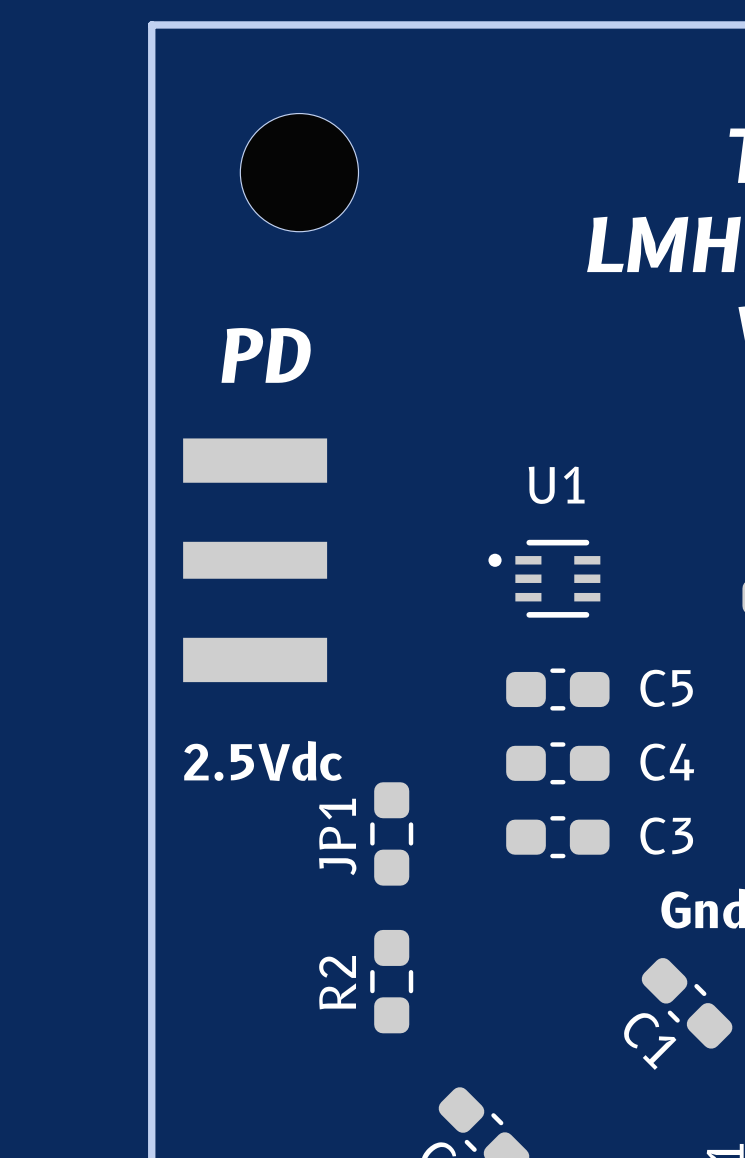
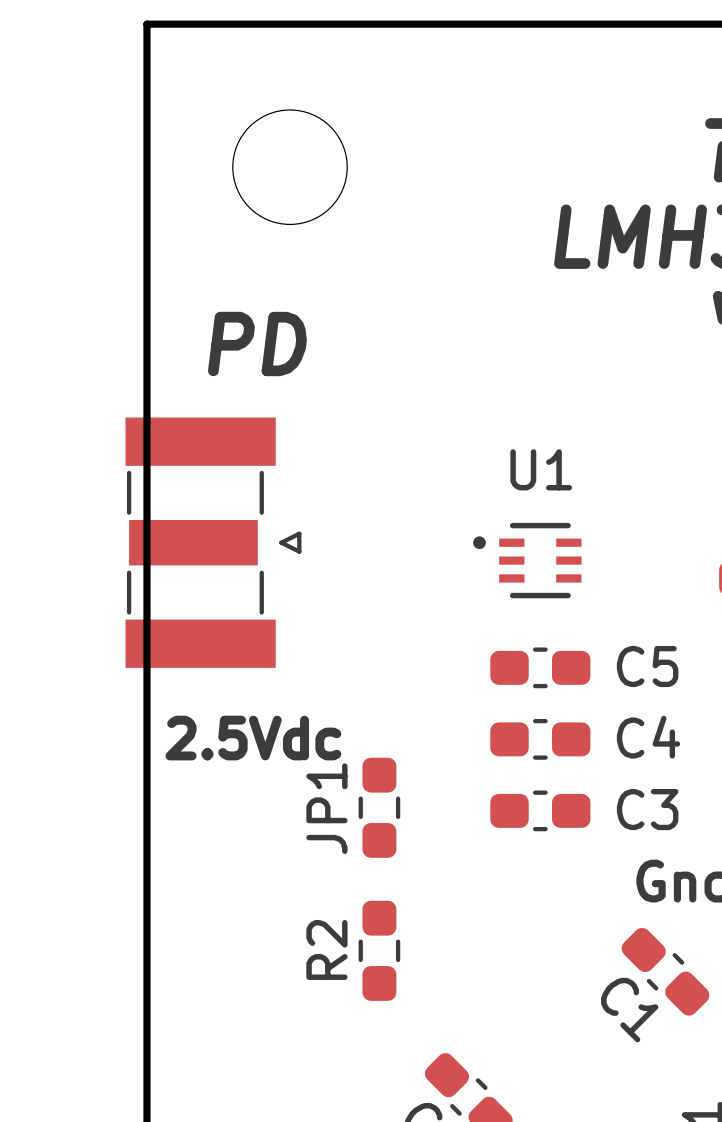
part footprint: [183, 438, 328, 683] -> [125, 417, 302, 668]

